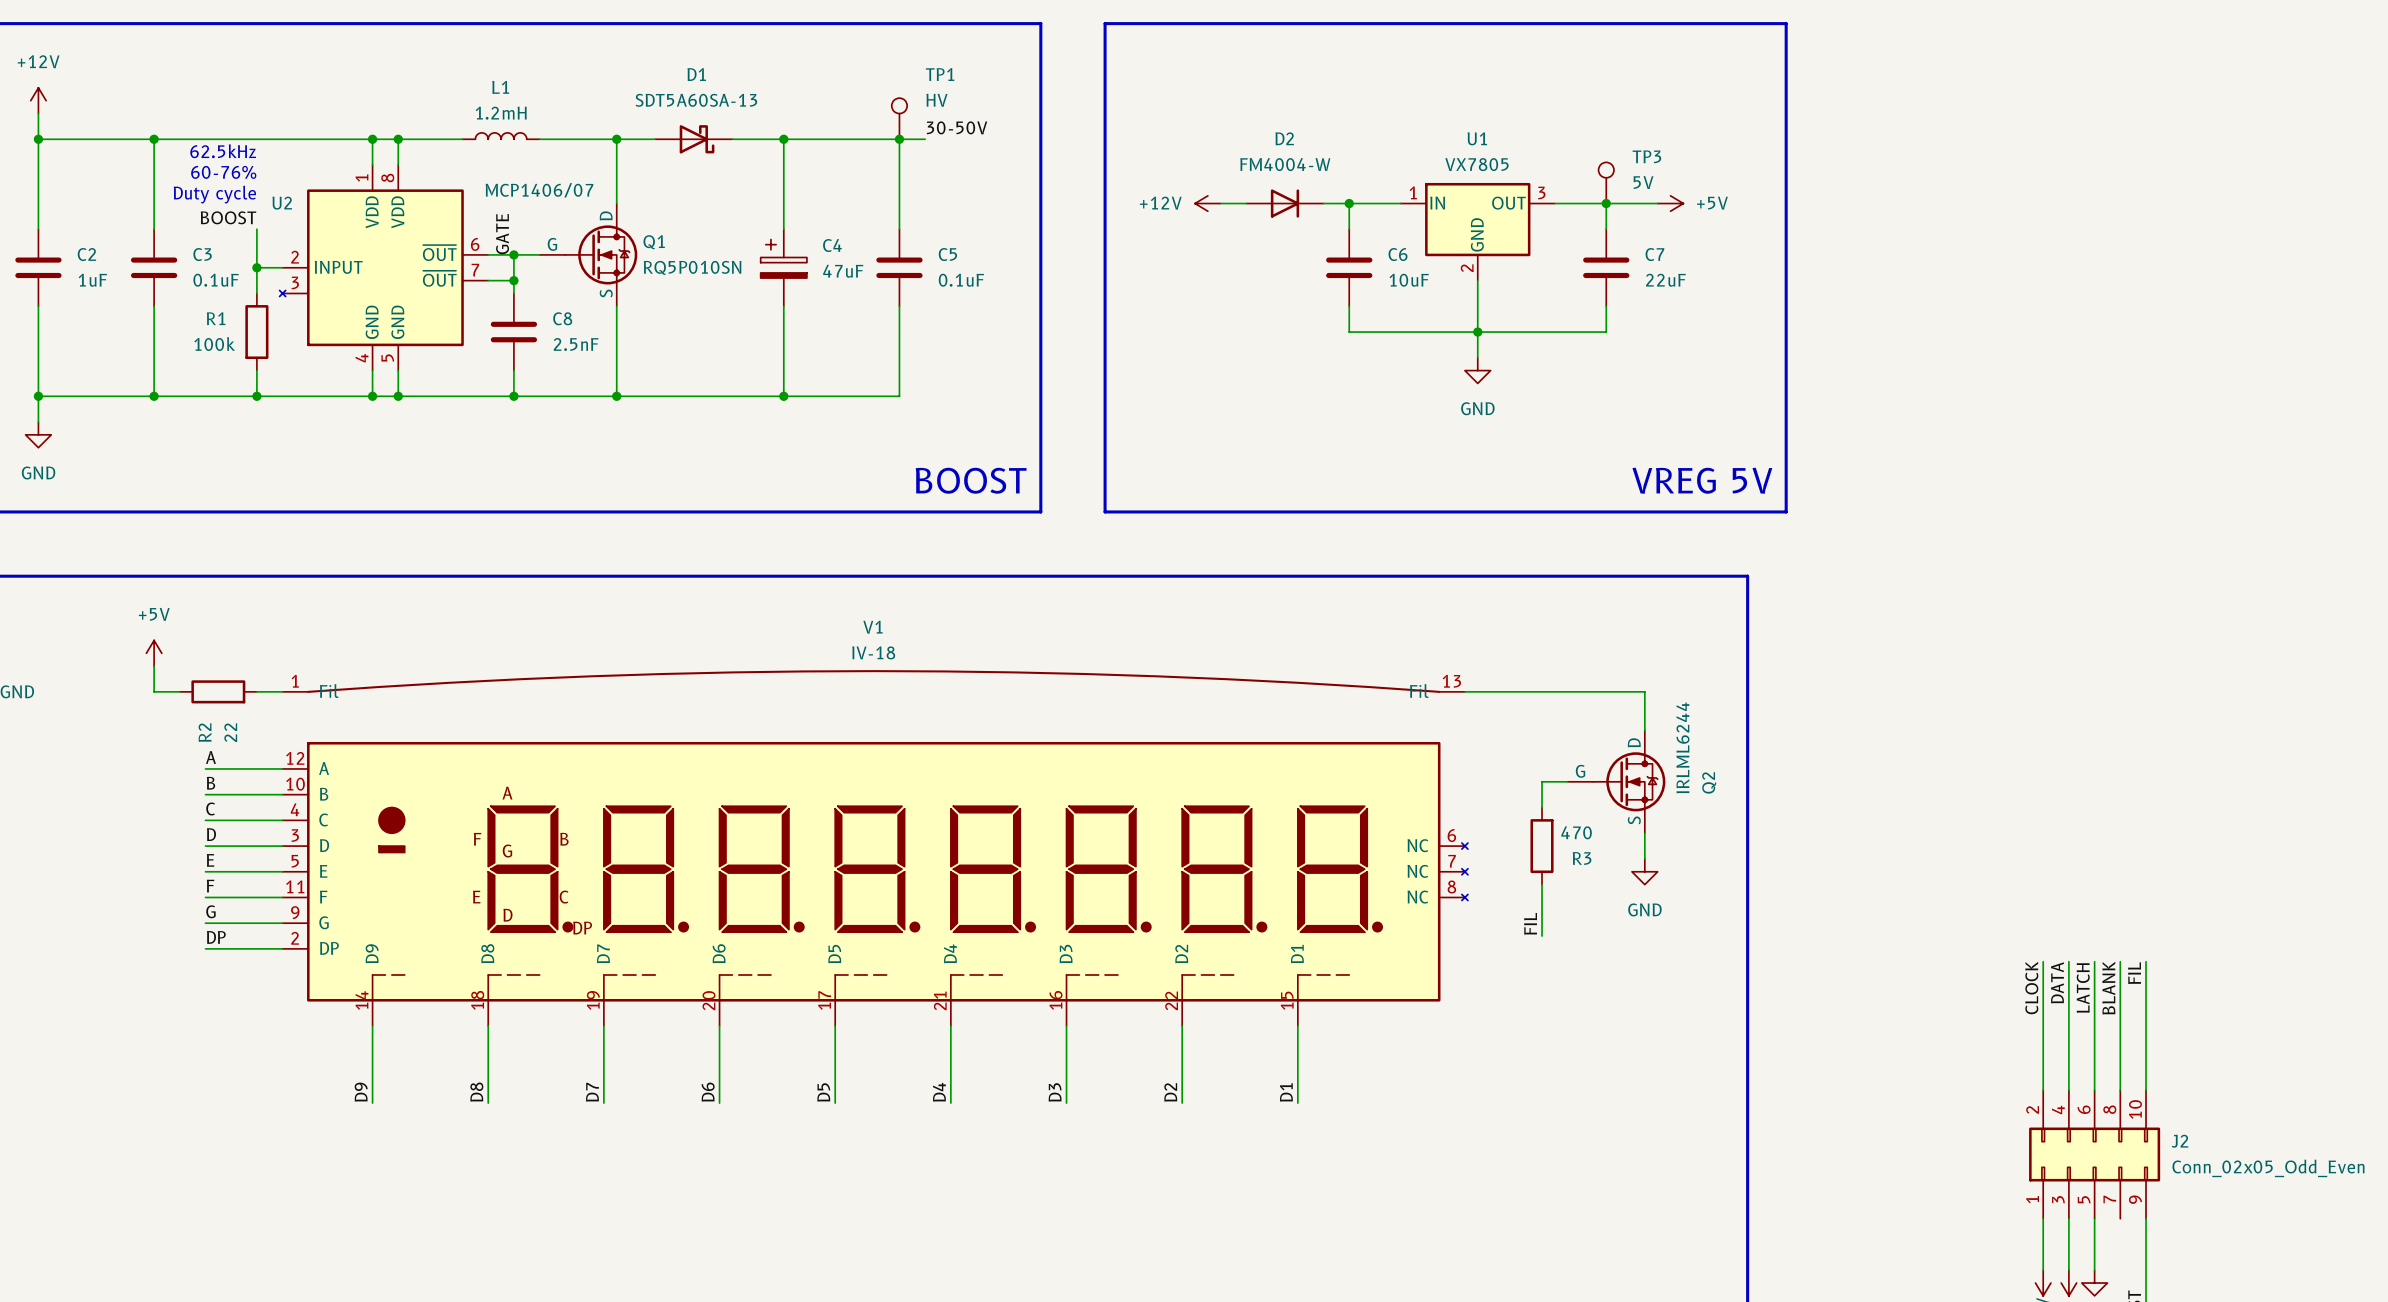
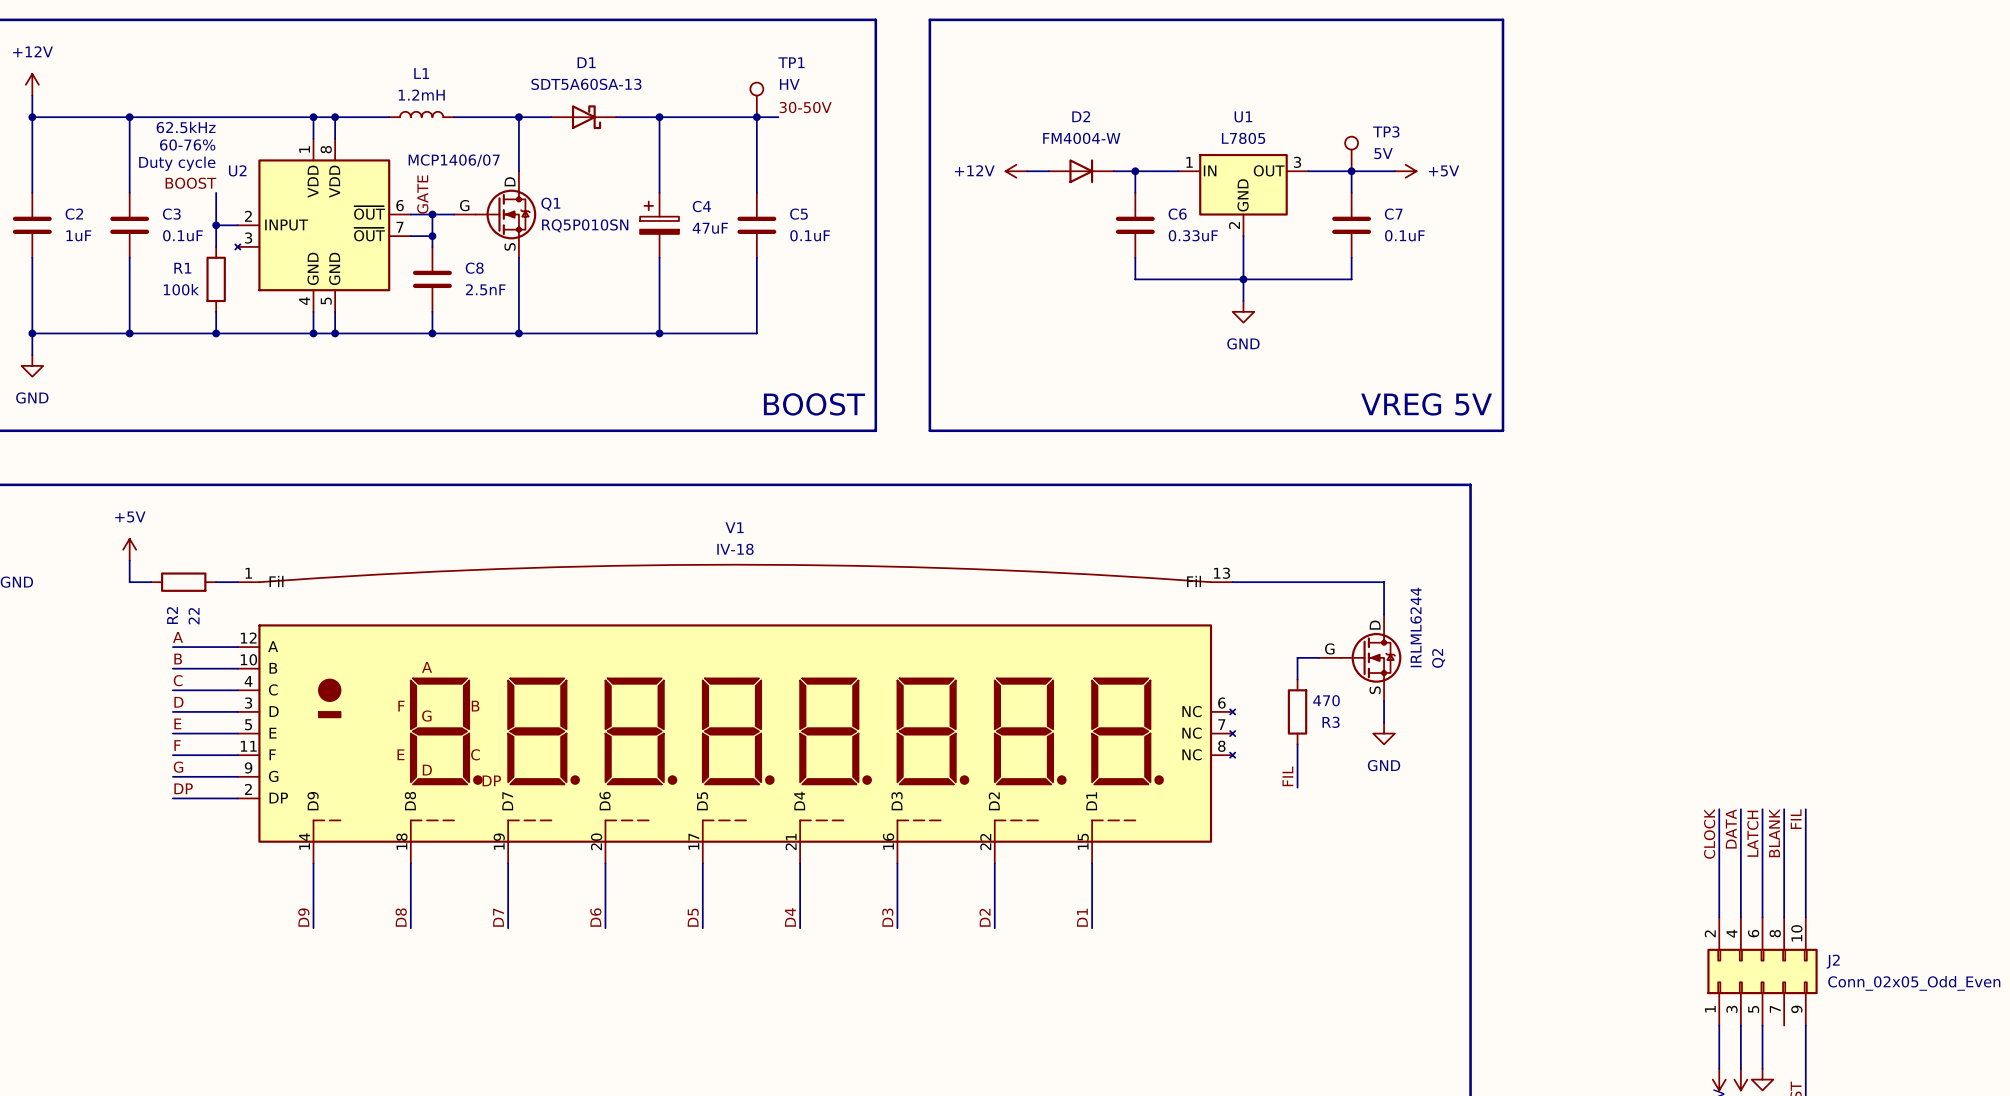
U1 value: VX7805 (1476, 164) -> L7805 (1243, 138)
C6 value: 10uF (1409, 280) -> 0.33uF (1193, 235)
C7 value: 22uF (1665, 280) -> 0.1uF (1404, 235)

